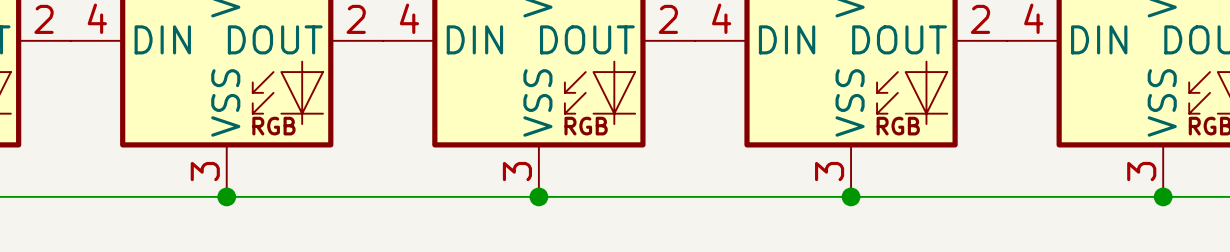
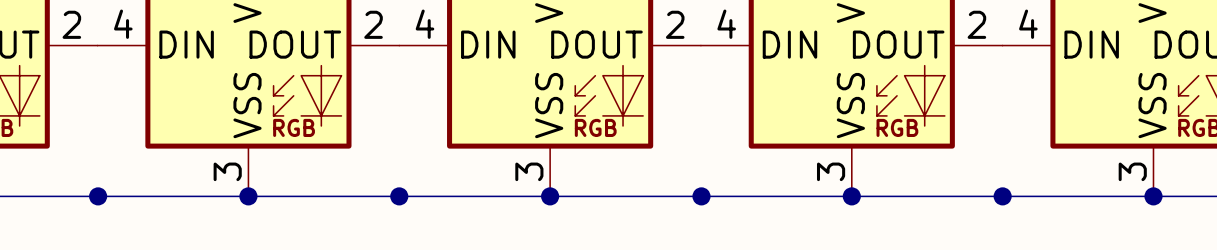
junction: none -> (98, 196)
junction: none -> (399, 196)
junction: none -> (701, 196)
junction: none -> (1002, 196)

